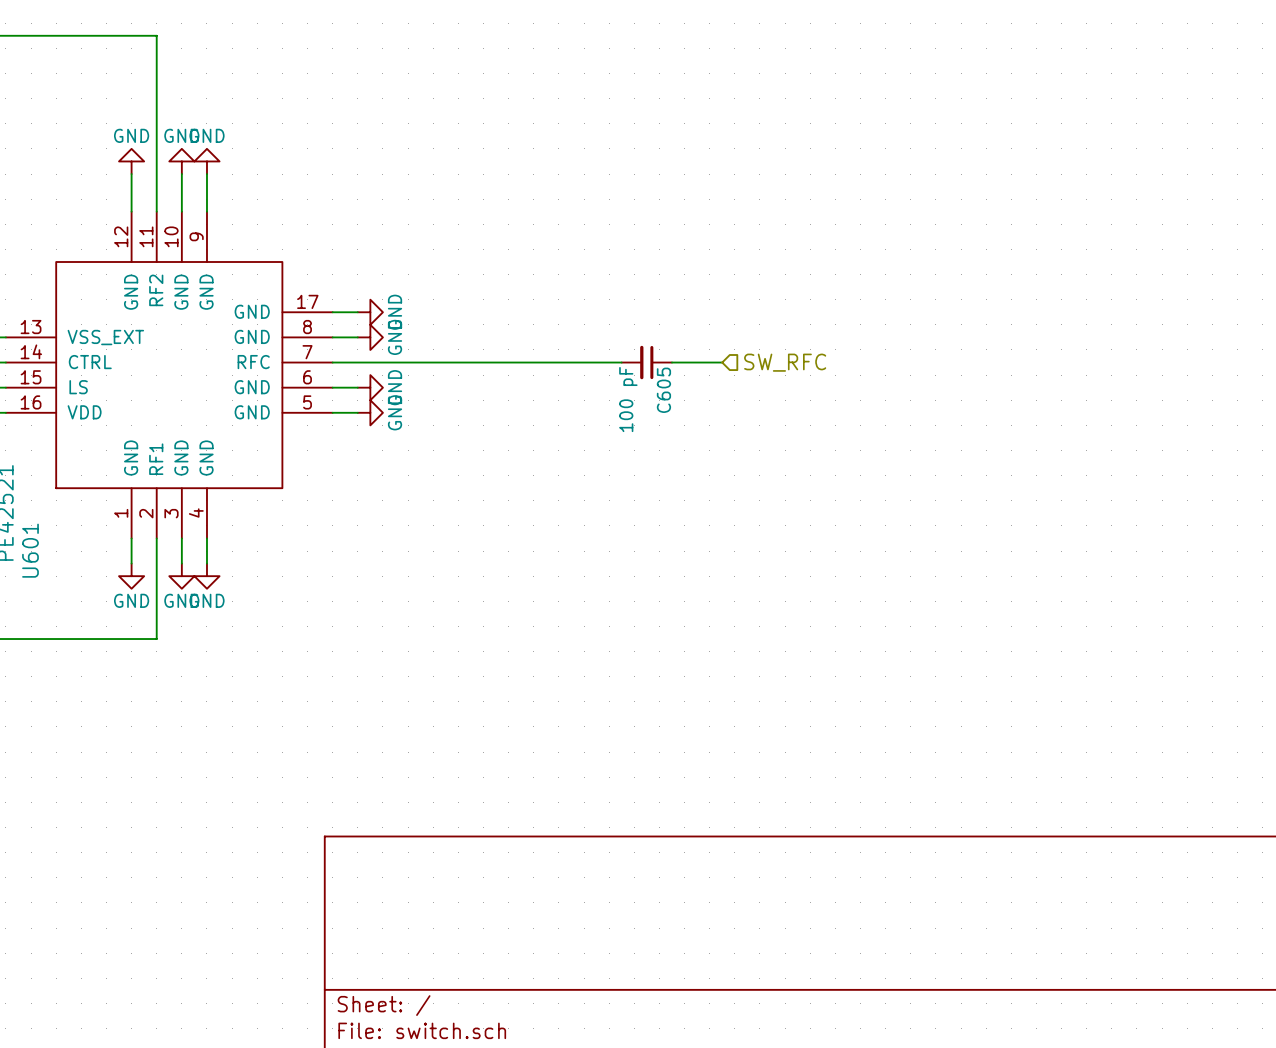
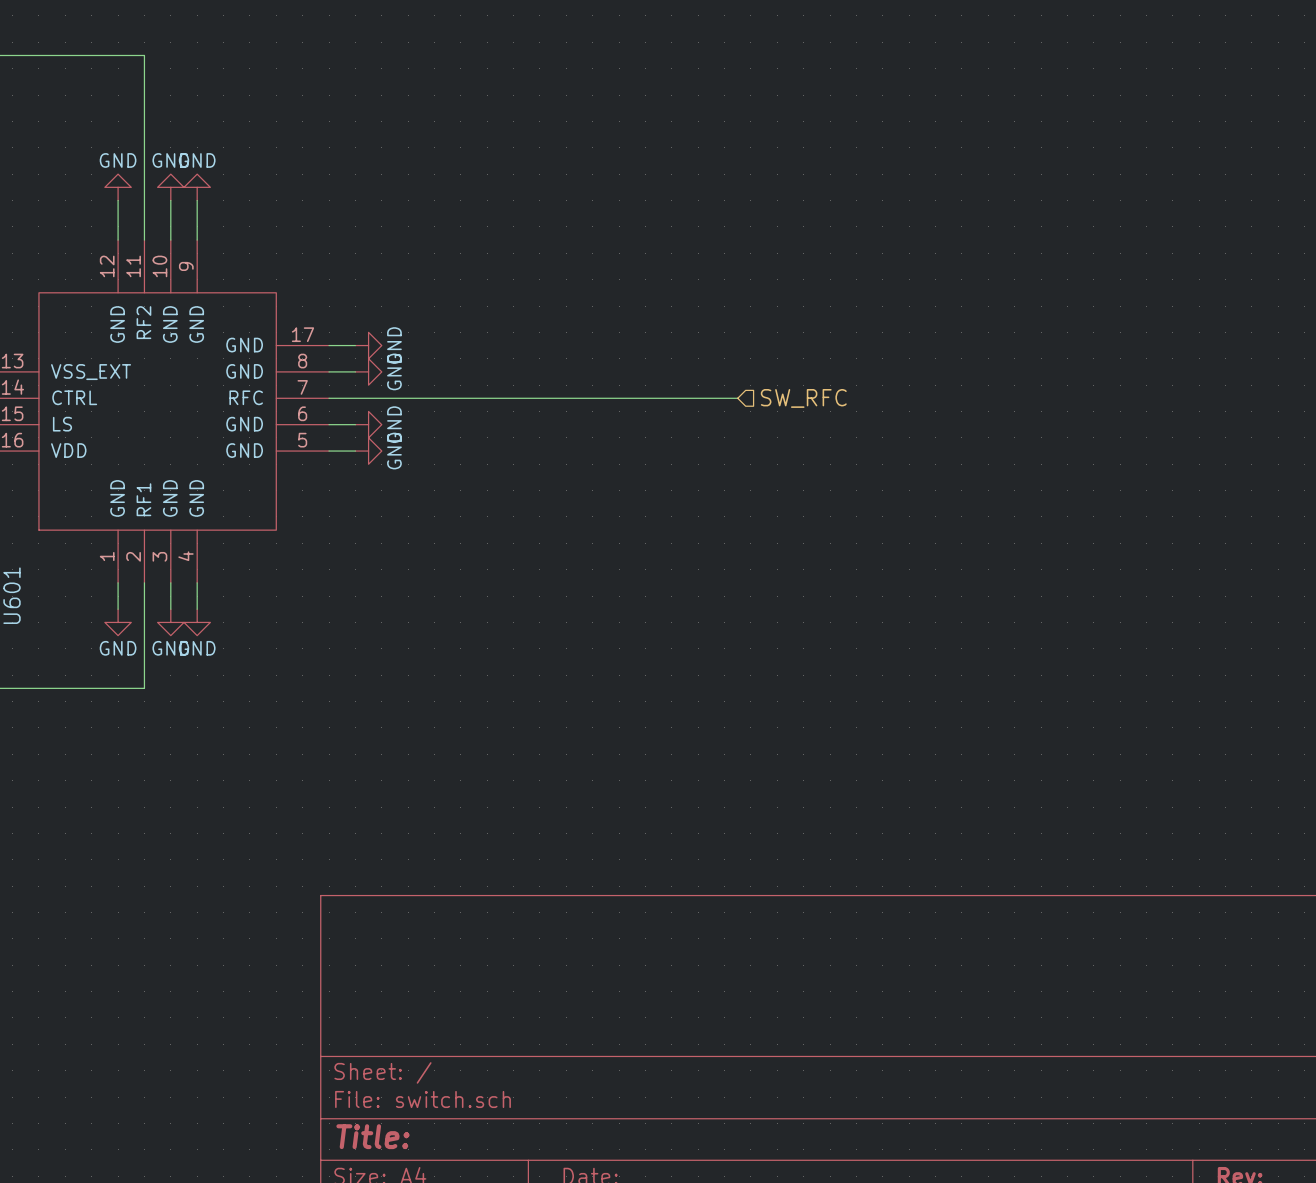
C605: 100 pF (646, 362) -> none

